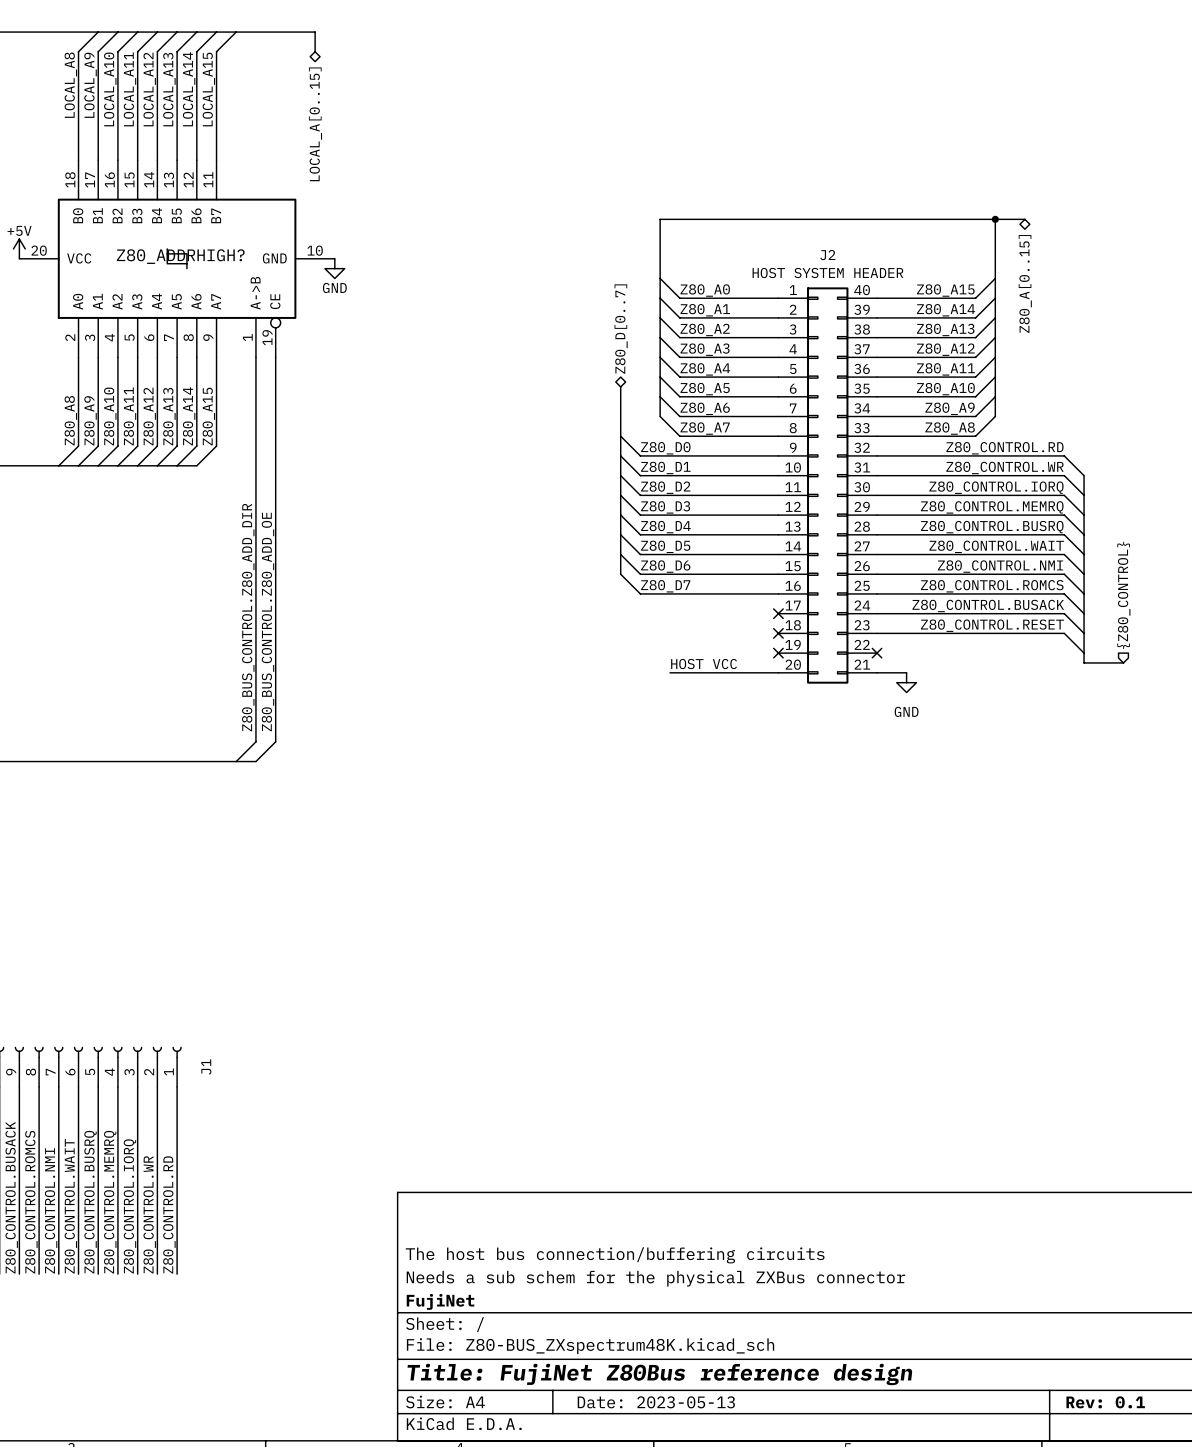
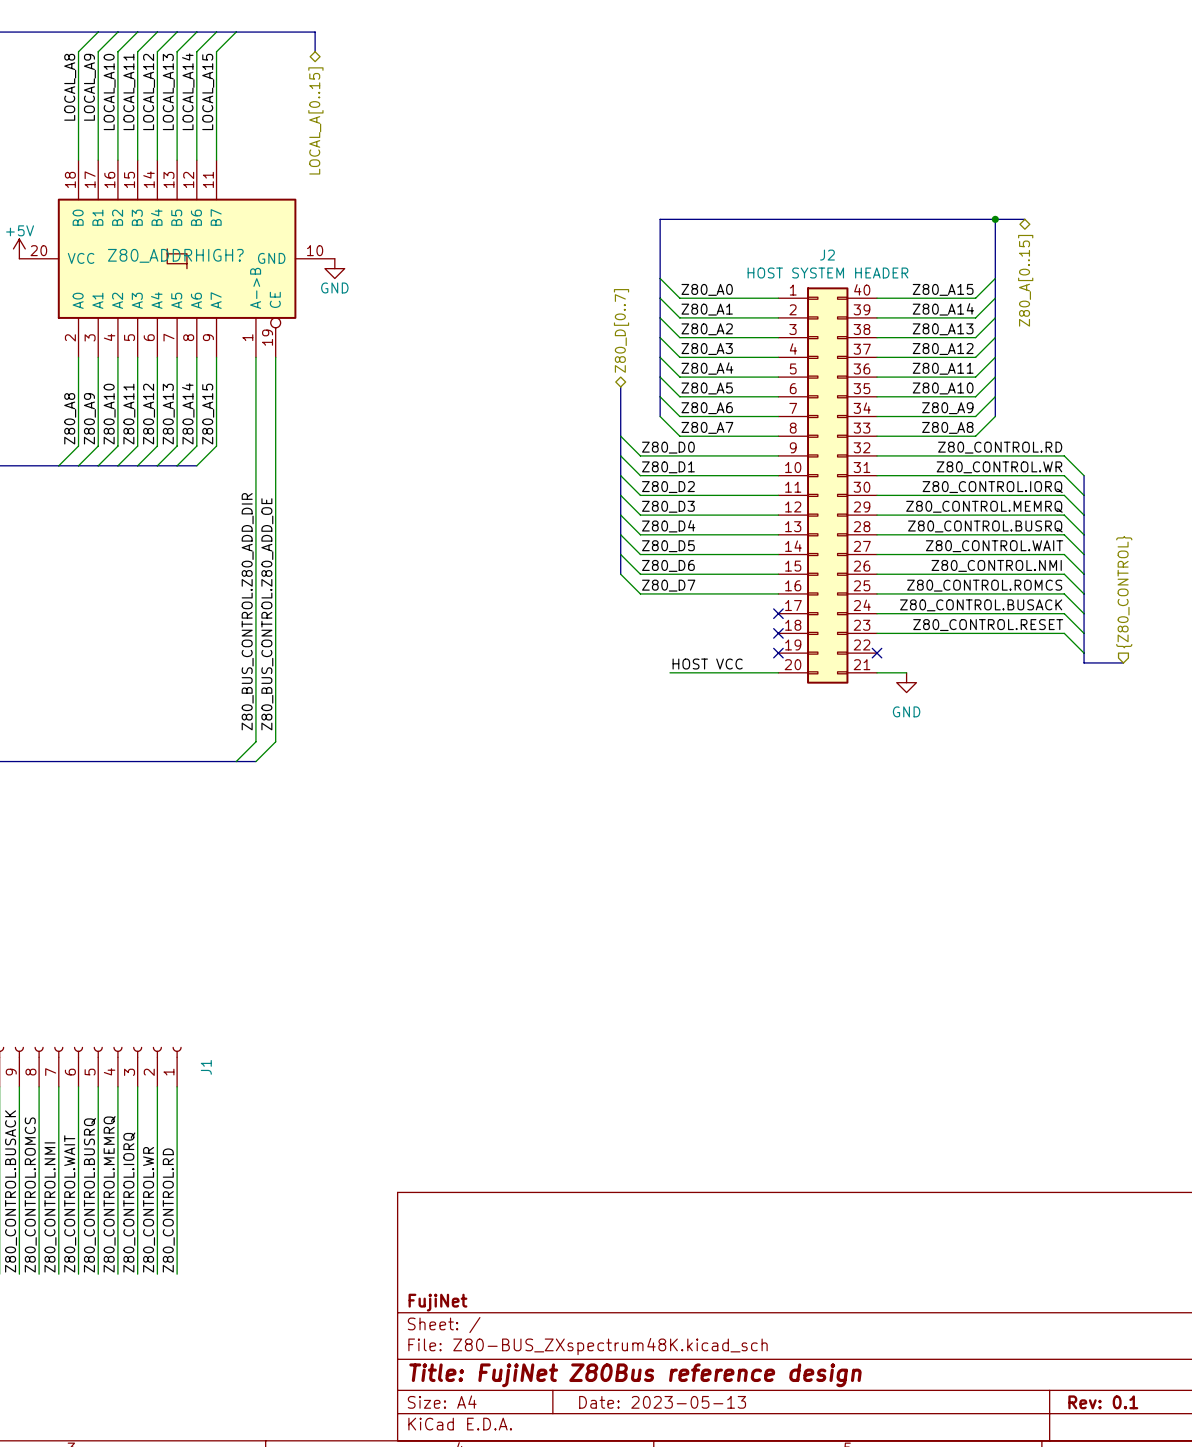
title block: The host bus connection/buffering circuits (615, 1255) -> none
title block: Needs a sub schem for the physical ZXBus connector (655, 1278) -> none

